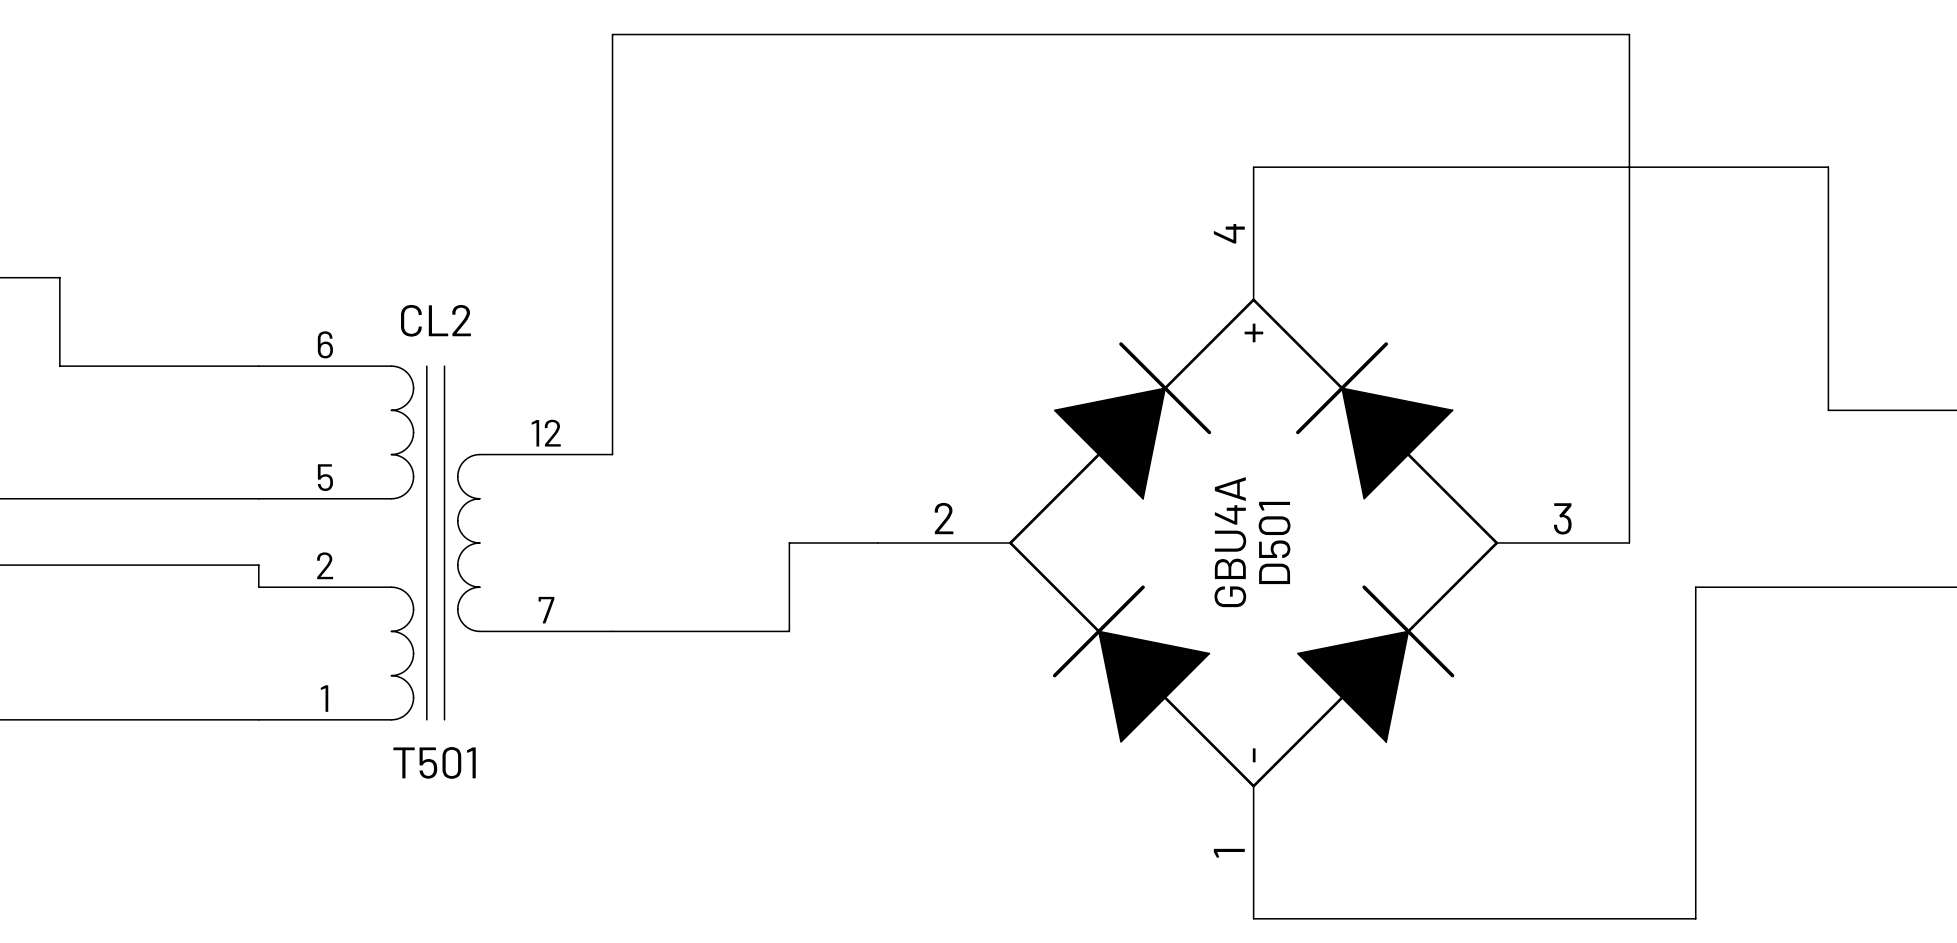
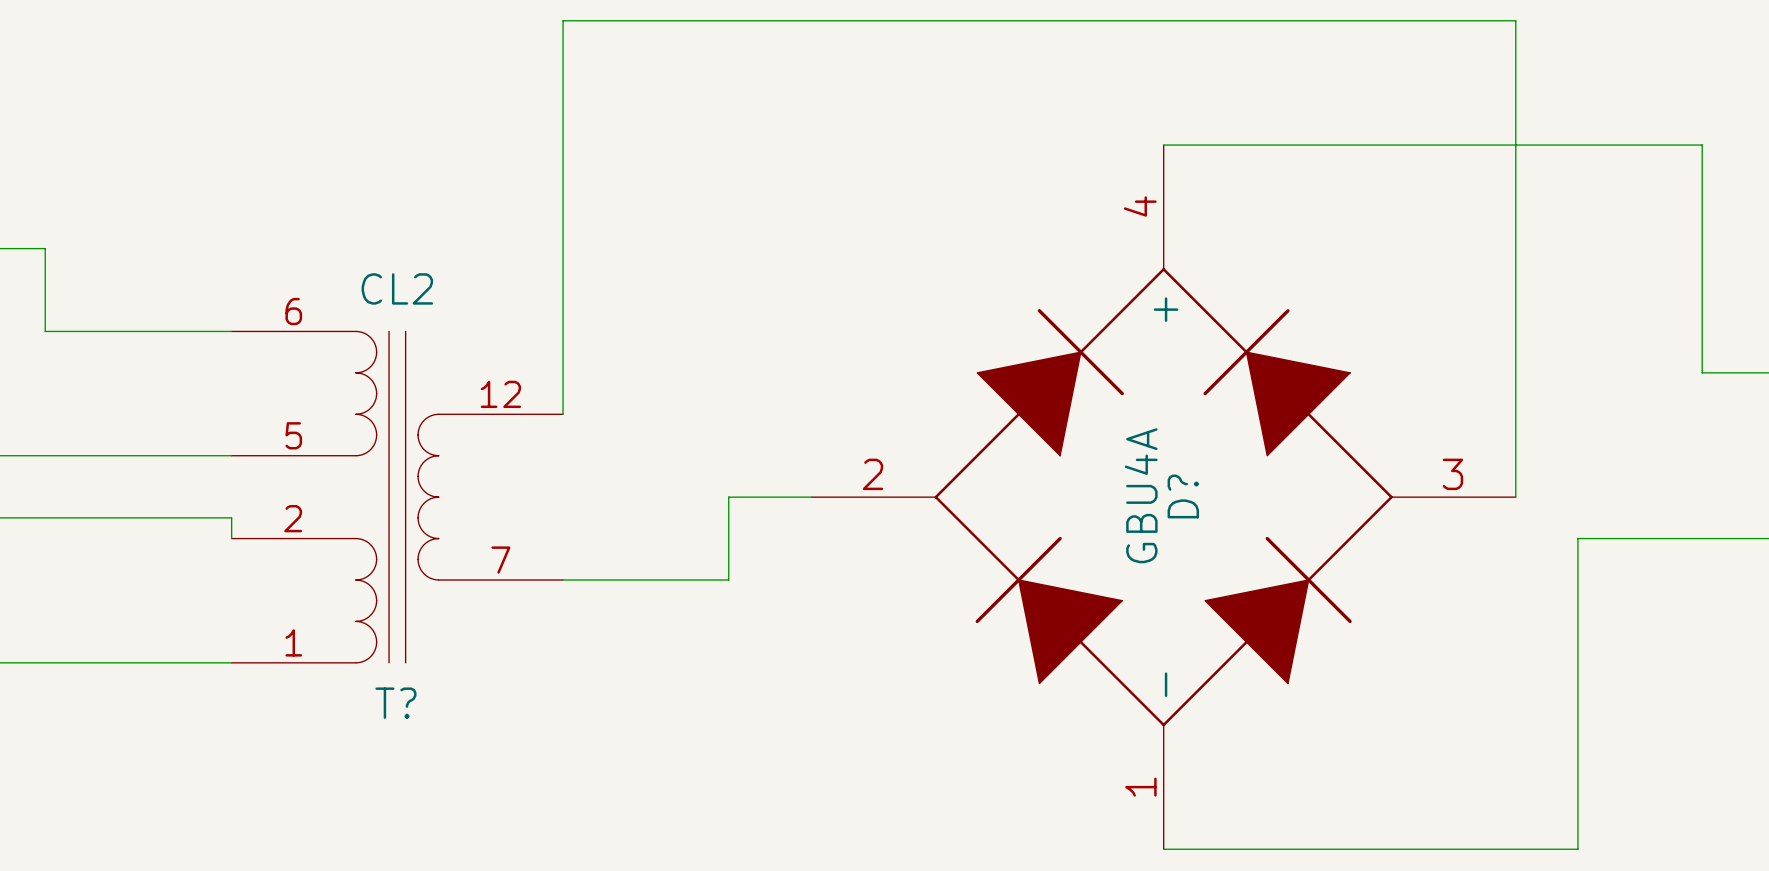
D501 name: D501 (1274, 542) -> D? (1183, 496)
T501 name: T501 (434, 762) -> T? (395, 703)

